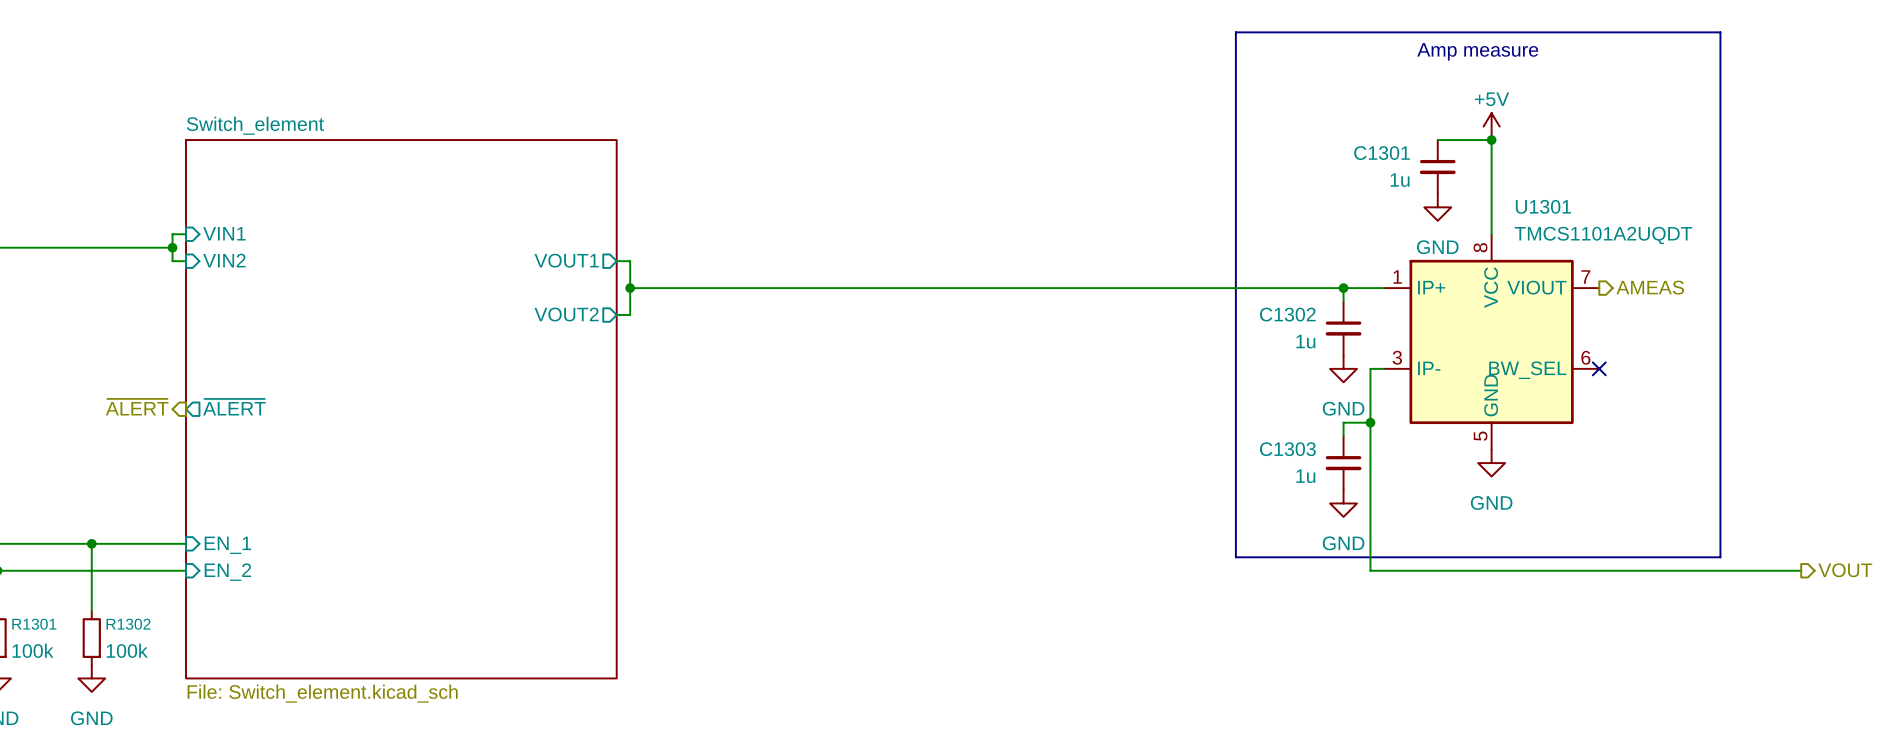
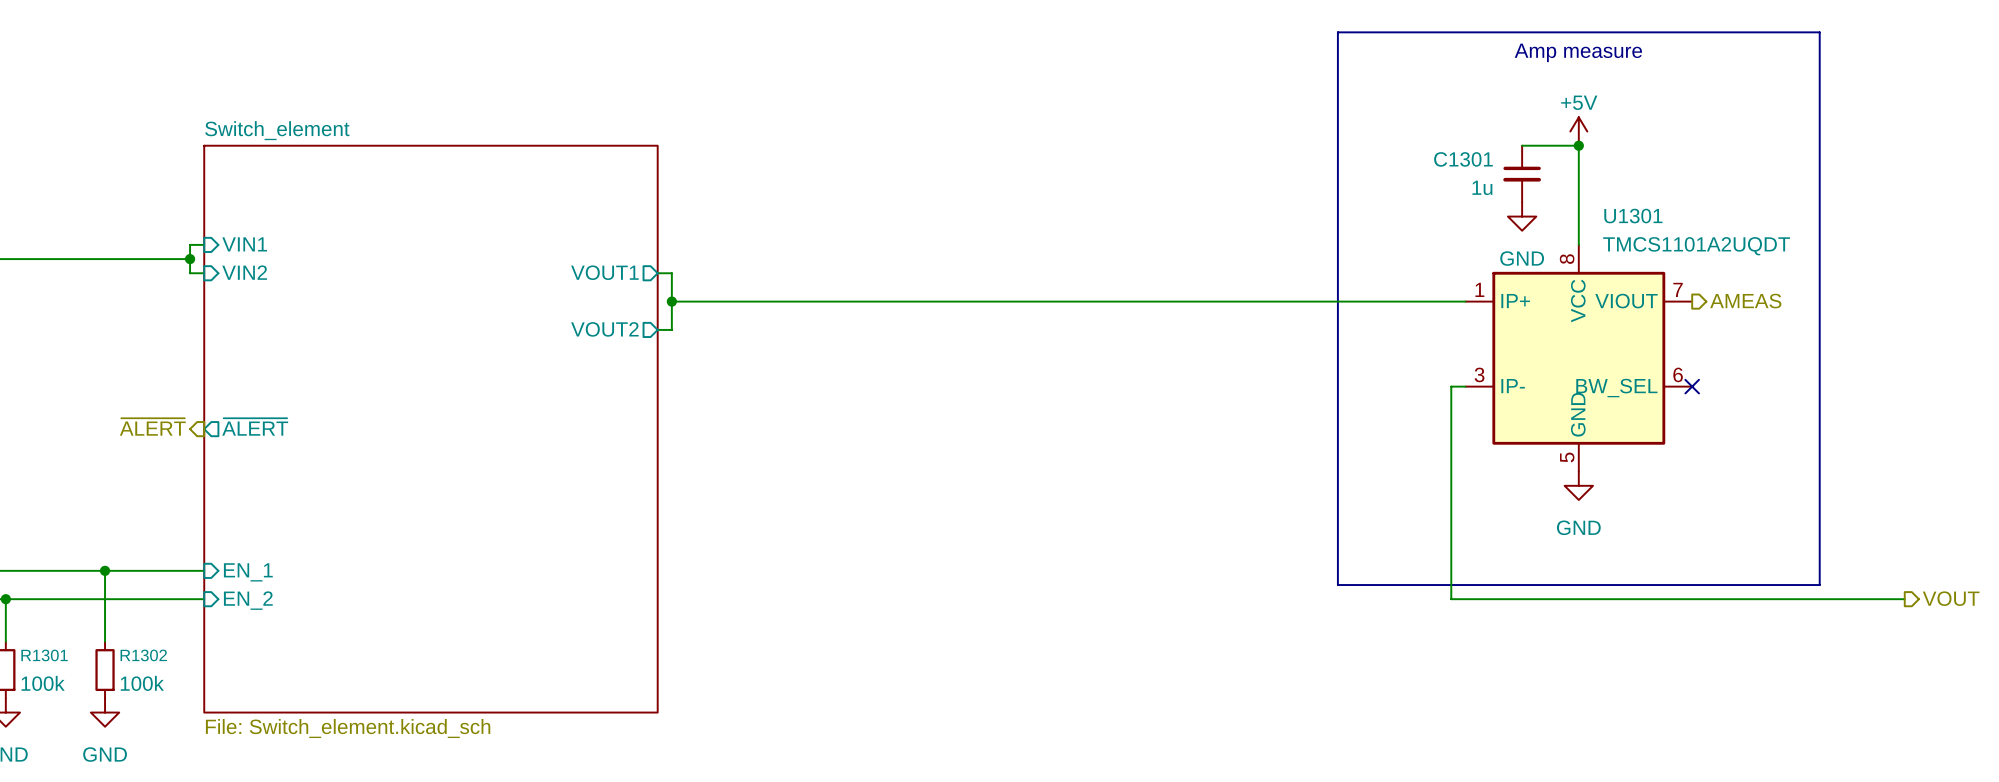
line: (1262, 32) (1235, 32) (1235, 557) (1262, 557) -> (1337, 32) (1337, 585)
text position: Amp measure (1477, 51) -> Amp measure (1578, 52)
wire: (1343, 288) (1343, 301) -> none
junction: (1343, 288) -> none
C1302: 1u (1343, 328) -> none
power symbol: GND (1343, 368) -> none
wire: (1370, 422) (1343, 422) (1343, 436) -> none
junction: (1370, 422) -> none
C1303: 1u (1343, 463) -> none
power symbol: GND (1343, 503) -> none

